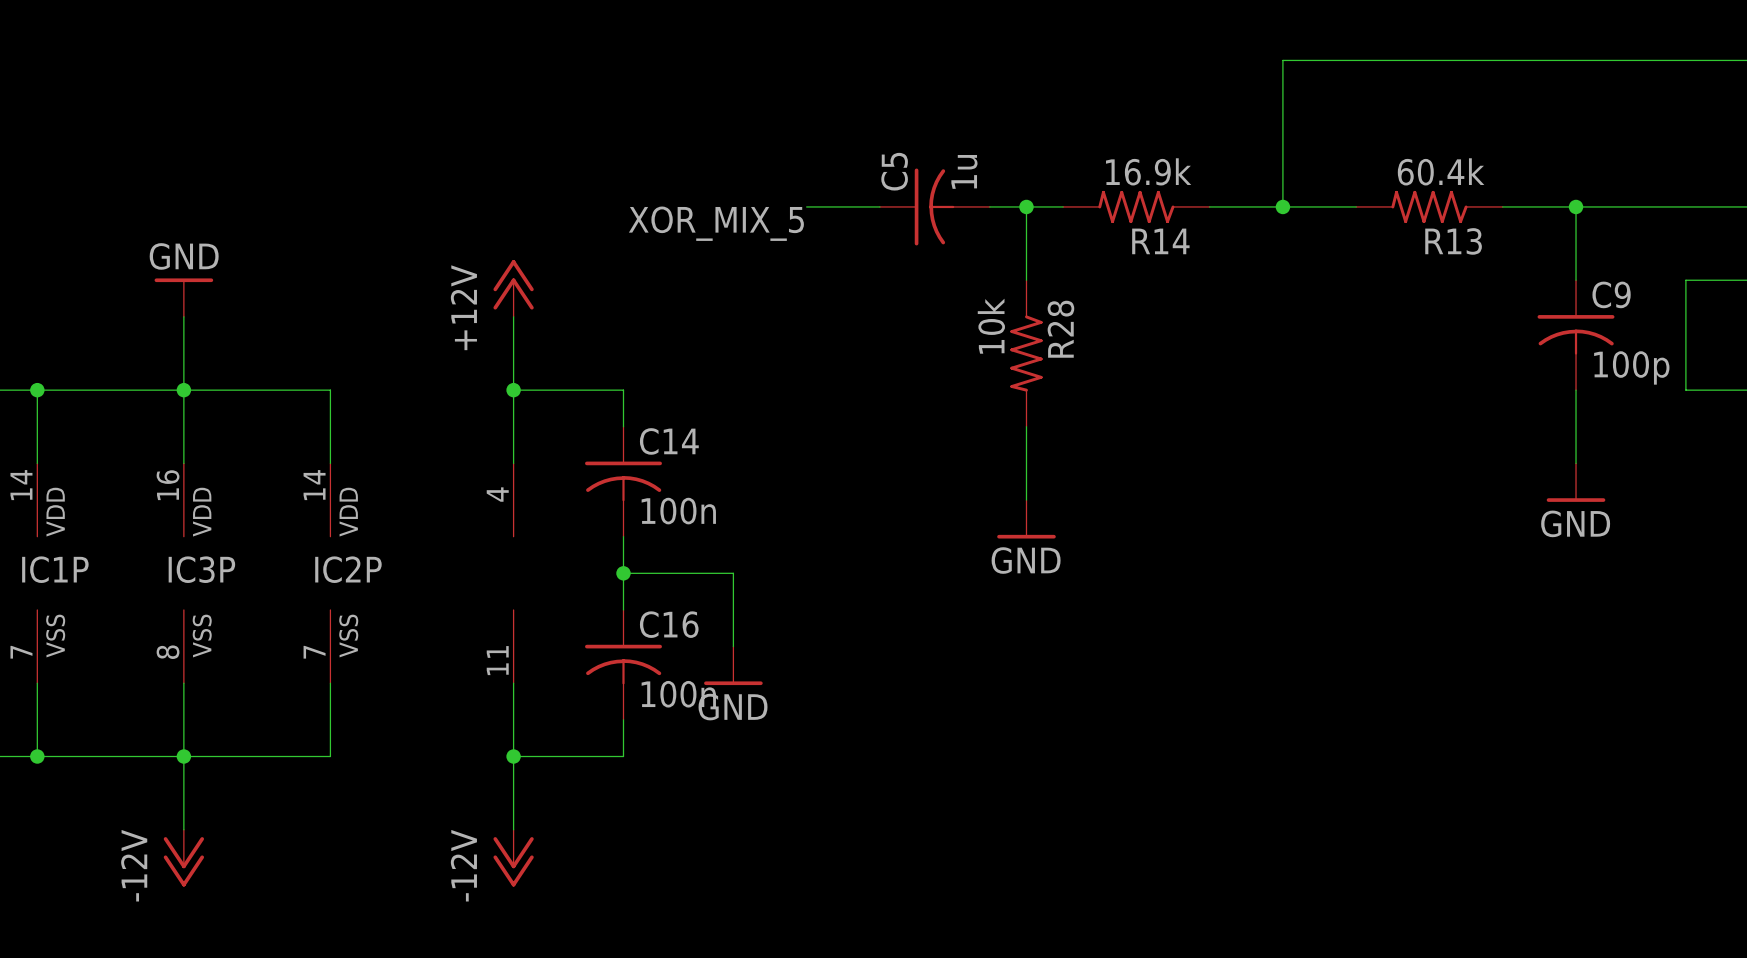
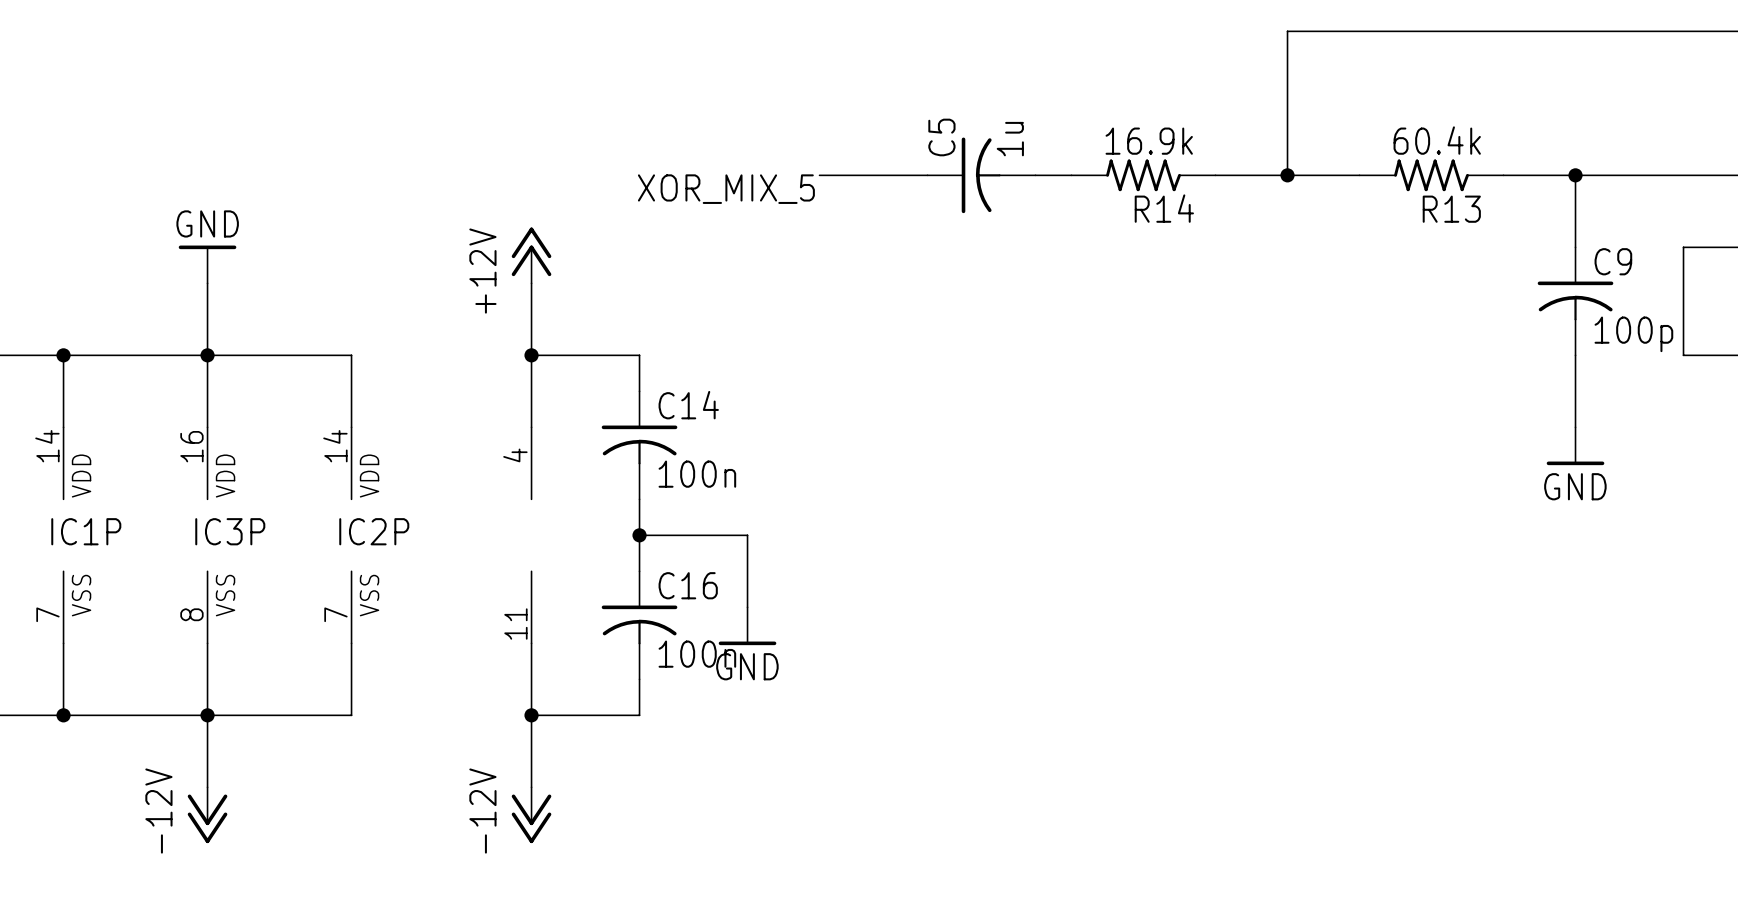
C5 position: (934, 206) -> (981, 175)
wire: (989, 206) (1026, 206) (1026, 280) -> none
junction: (1026, 206) -> none
R28: 10k (1026, 353) -> none
wire: (1026, 426) (1026, 500) -> none
power symbol: GND (1026, 519) -> none

